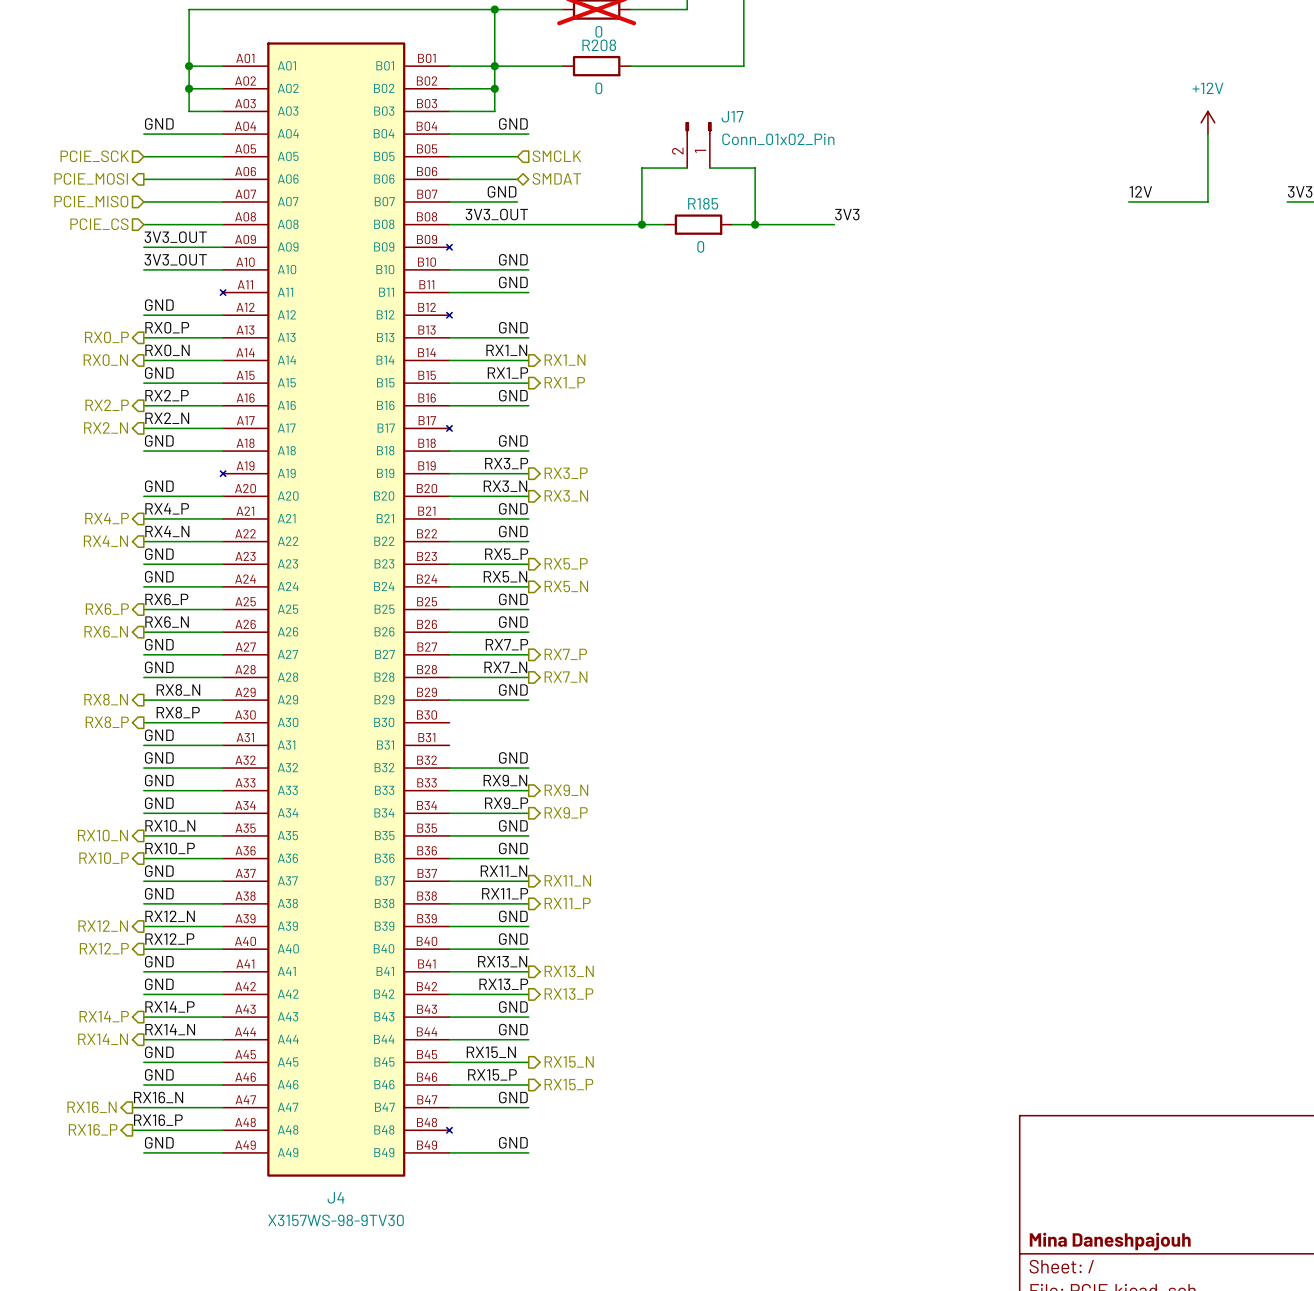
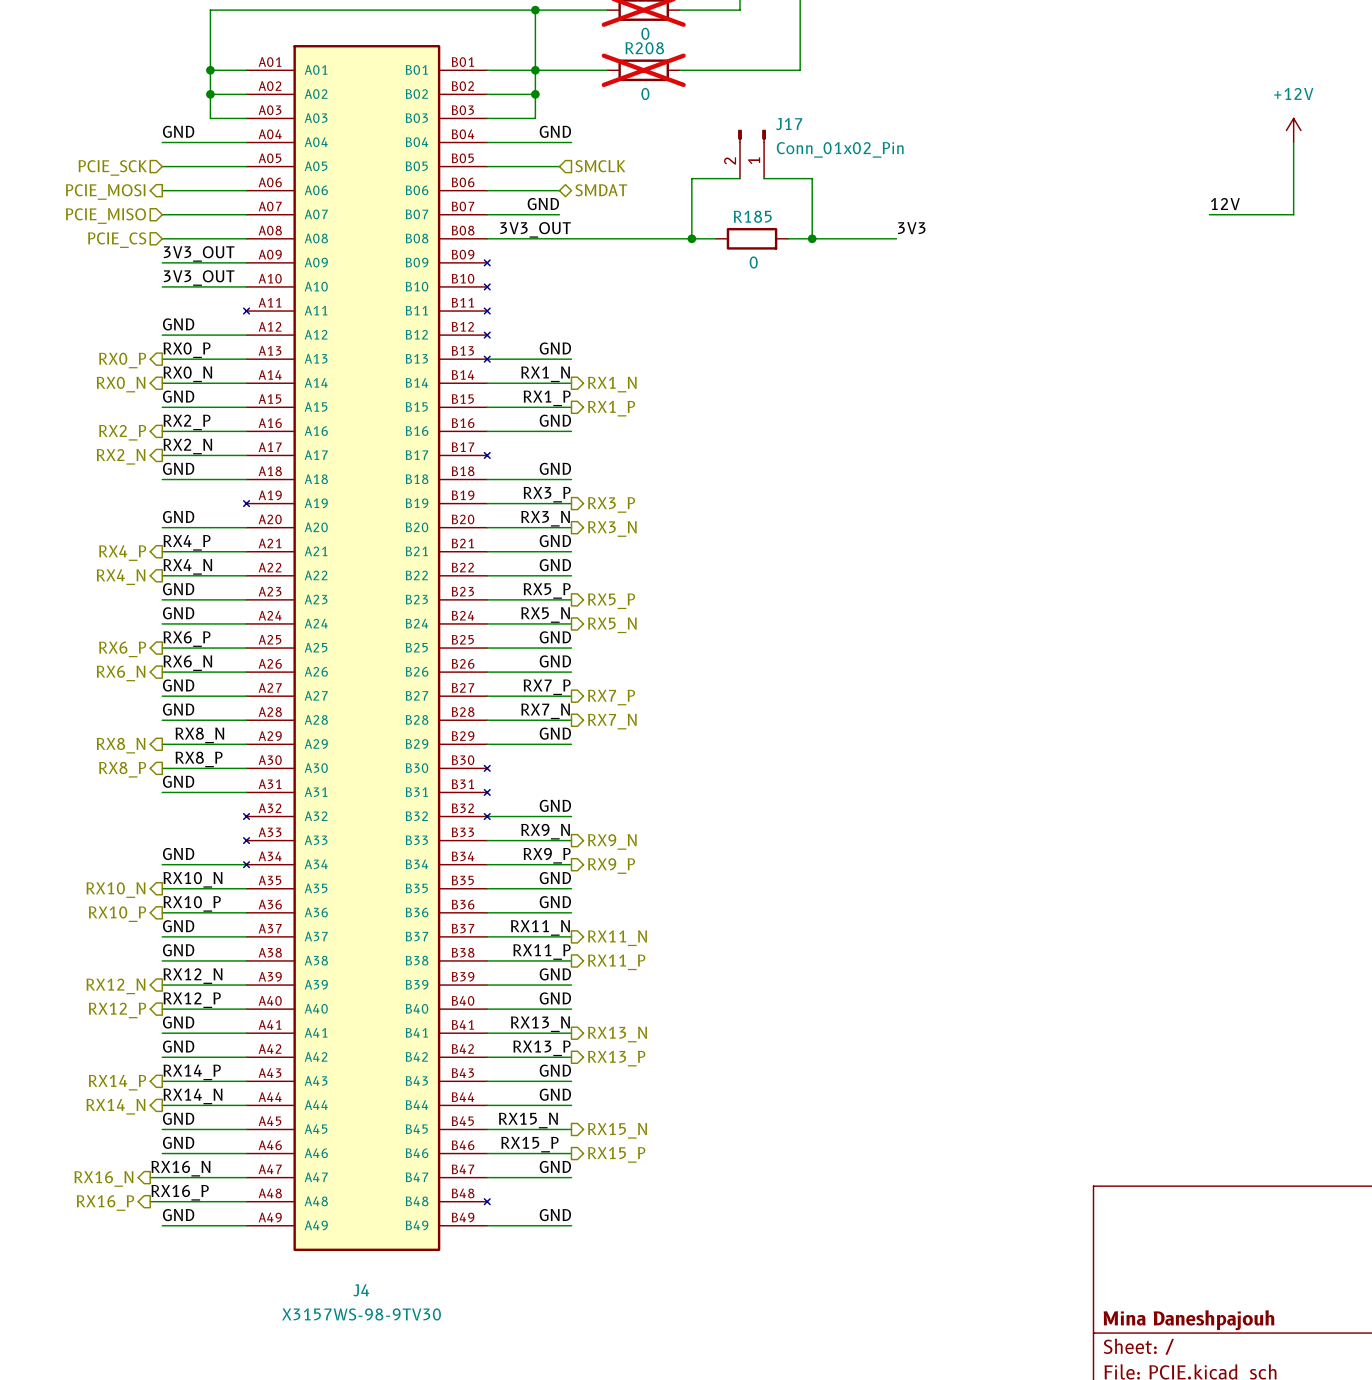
J4 symbol: [220, 42, 453, 1177] -> [243, 45, 491, 1252]
R208 do-not-place cross: none -> (643, 70)
label: GND (513, 259) -> none
wire: (449, 269) (528, 269) -> none
label: GND (513, 282) -> none
wire: (449, 292) (528, 292) -> none
label: GND (159, 757) -> none
wire: (143, 768) (223, 768) -> none
label: GND (159, 780) -> none
wire: (143, 790) (223, 790) -> none

